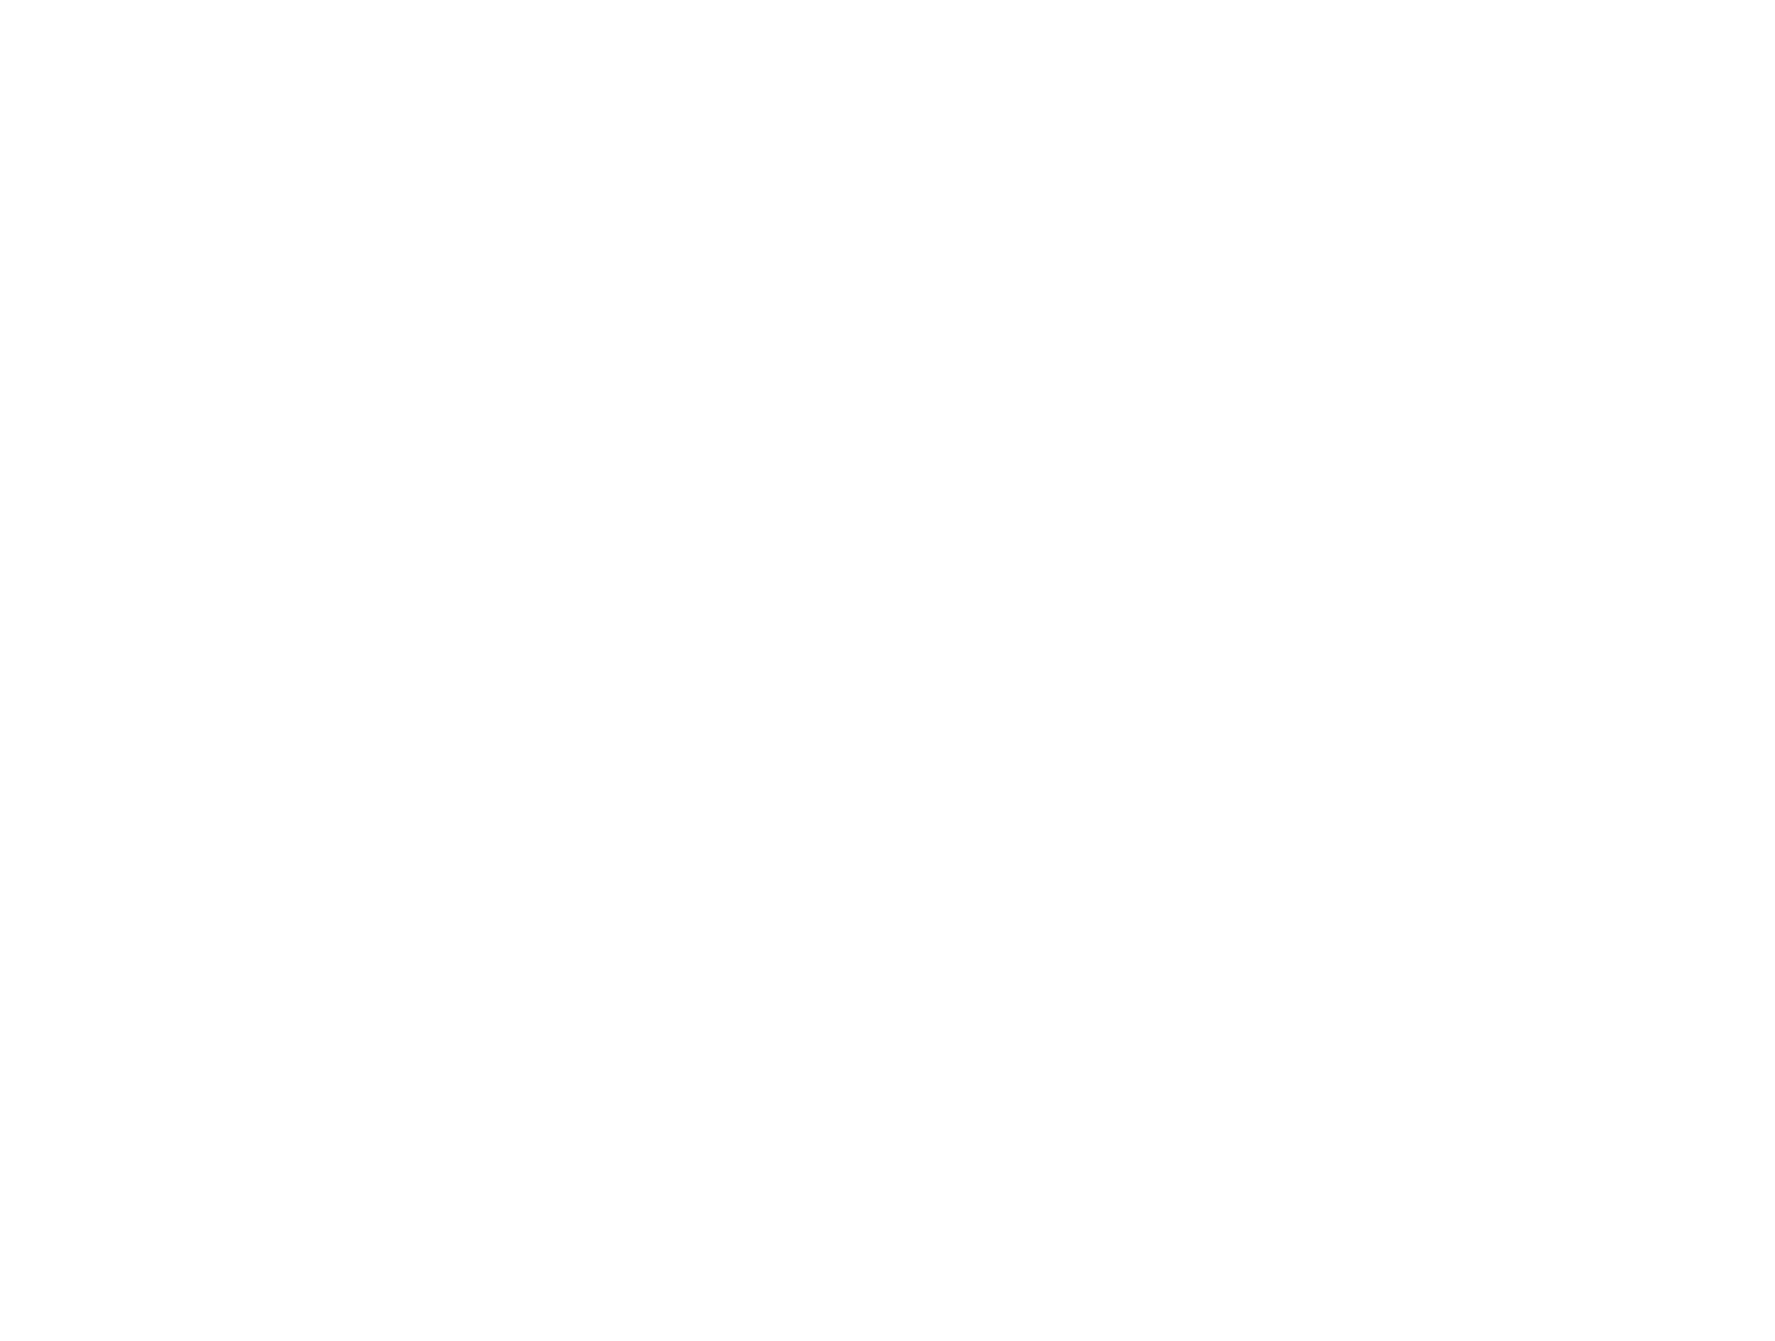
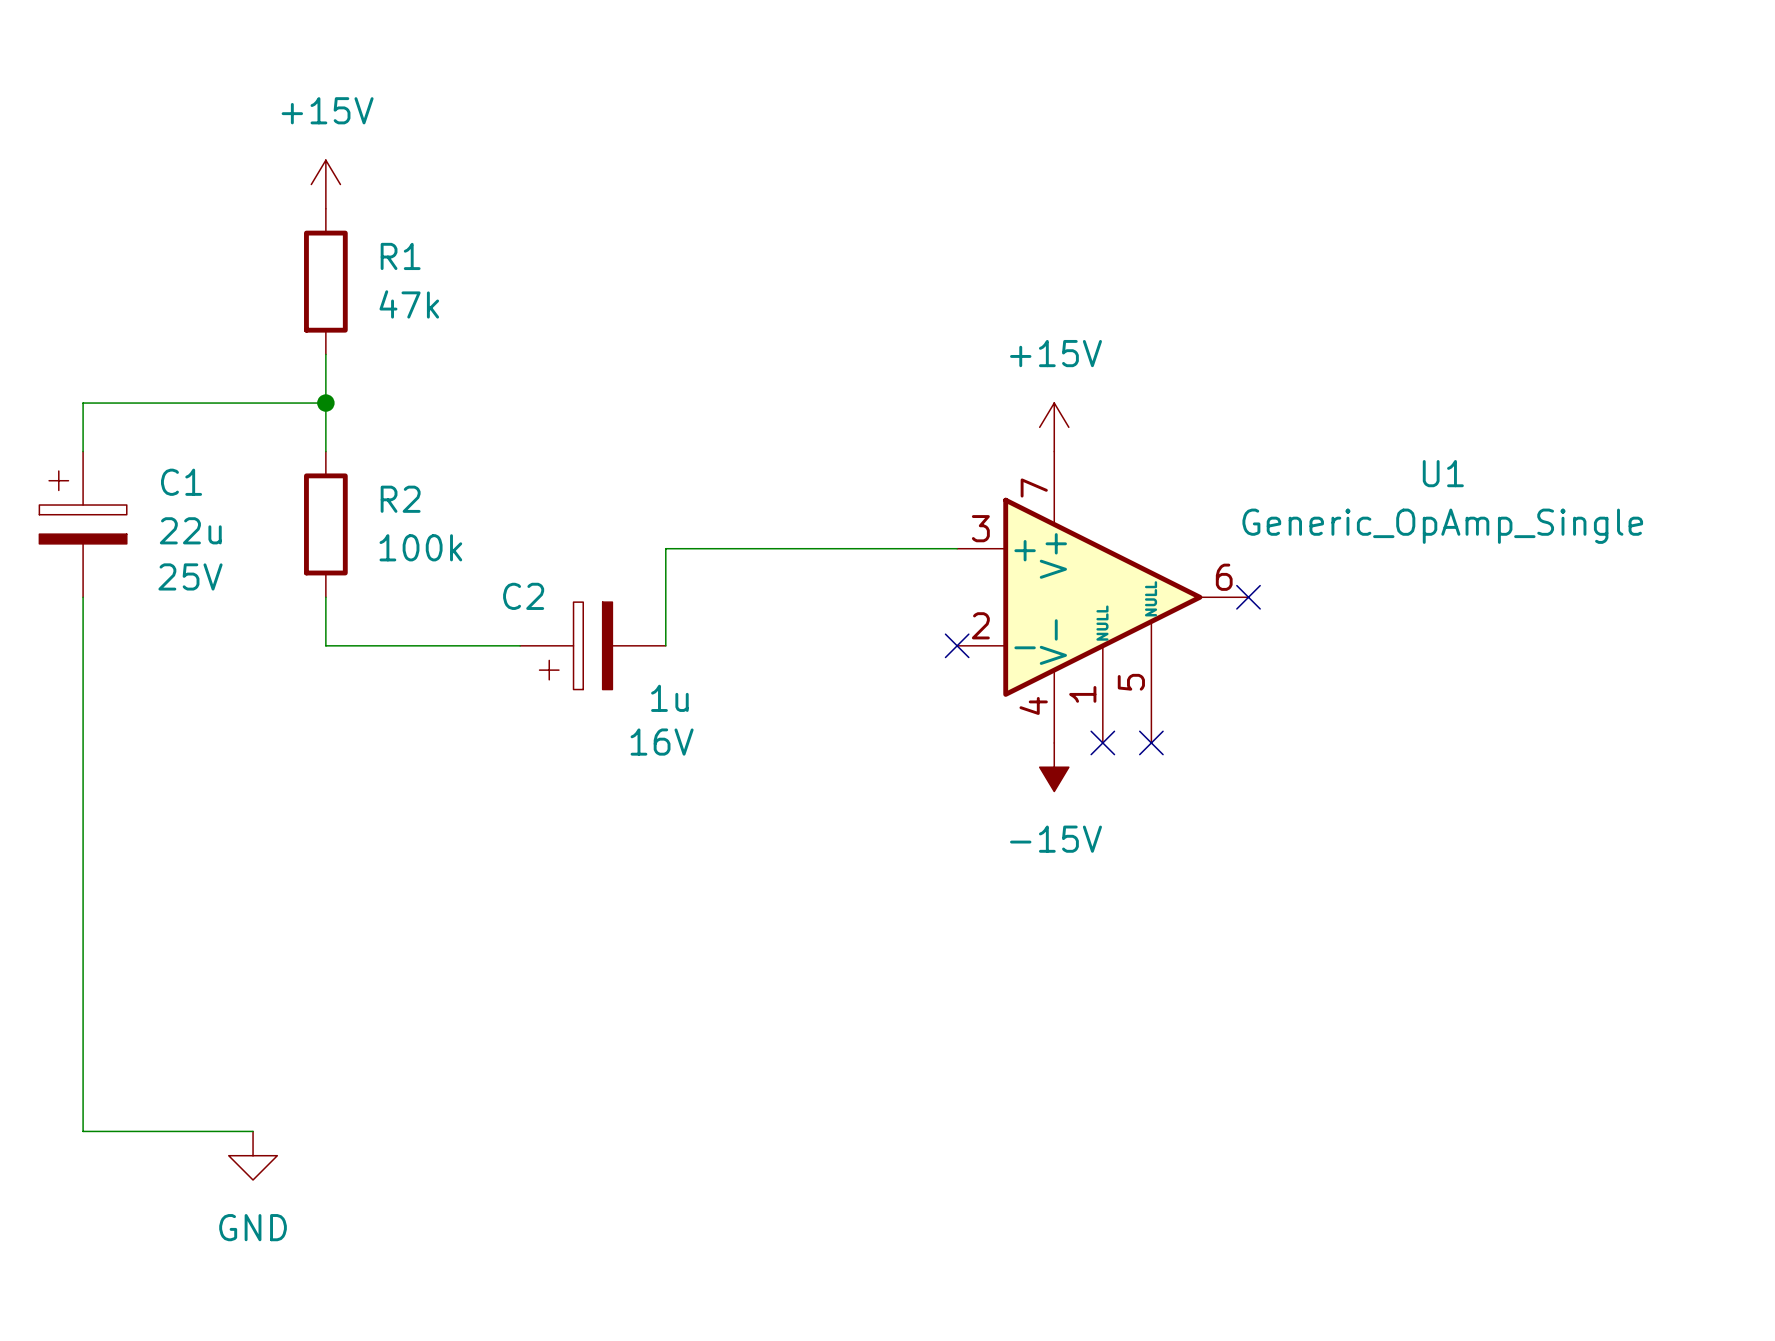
power symbol: none -> +15V (325, 184)
R1: none -> 47k (325, 281)
wire: none -> (325, 354) (325, 451)
wire: none -> (325, 403) (83, 403) (83, 451)
junction: none -> (325, 403)
power symbol: none -> +15V (1054, 427)
C1: none -> 22u (83, 524)
R2: none -> 100k (325, 524)
wire: none -> (957, 548) (665, 548) (665, 645)
wire: none -> (83, 597) (83, 1131) (253, 1131)
wire: none -> (325, 597) (325, 645) (520, 645)
U1: none -> Generic_OpAmp_Single (1102, 597)
no-connect mark: none -> (1248, 597)
C2: none -> 1u (592, 645)
no-connect mark: none -> (957, 645)
no-connect mark: none -> (1102, 742)
no-connect mark: none -> (1151, 742)
power symbol: none -> -15V (1054, 767)
power symbol: none -> GND (253, 1155)

